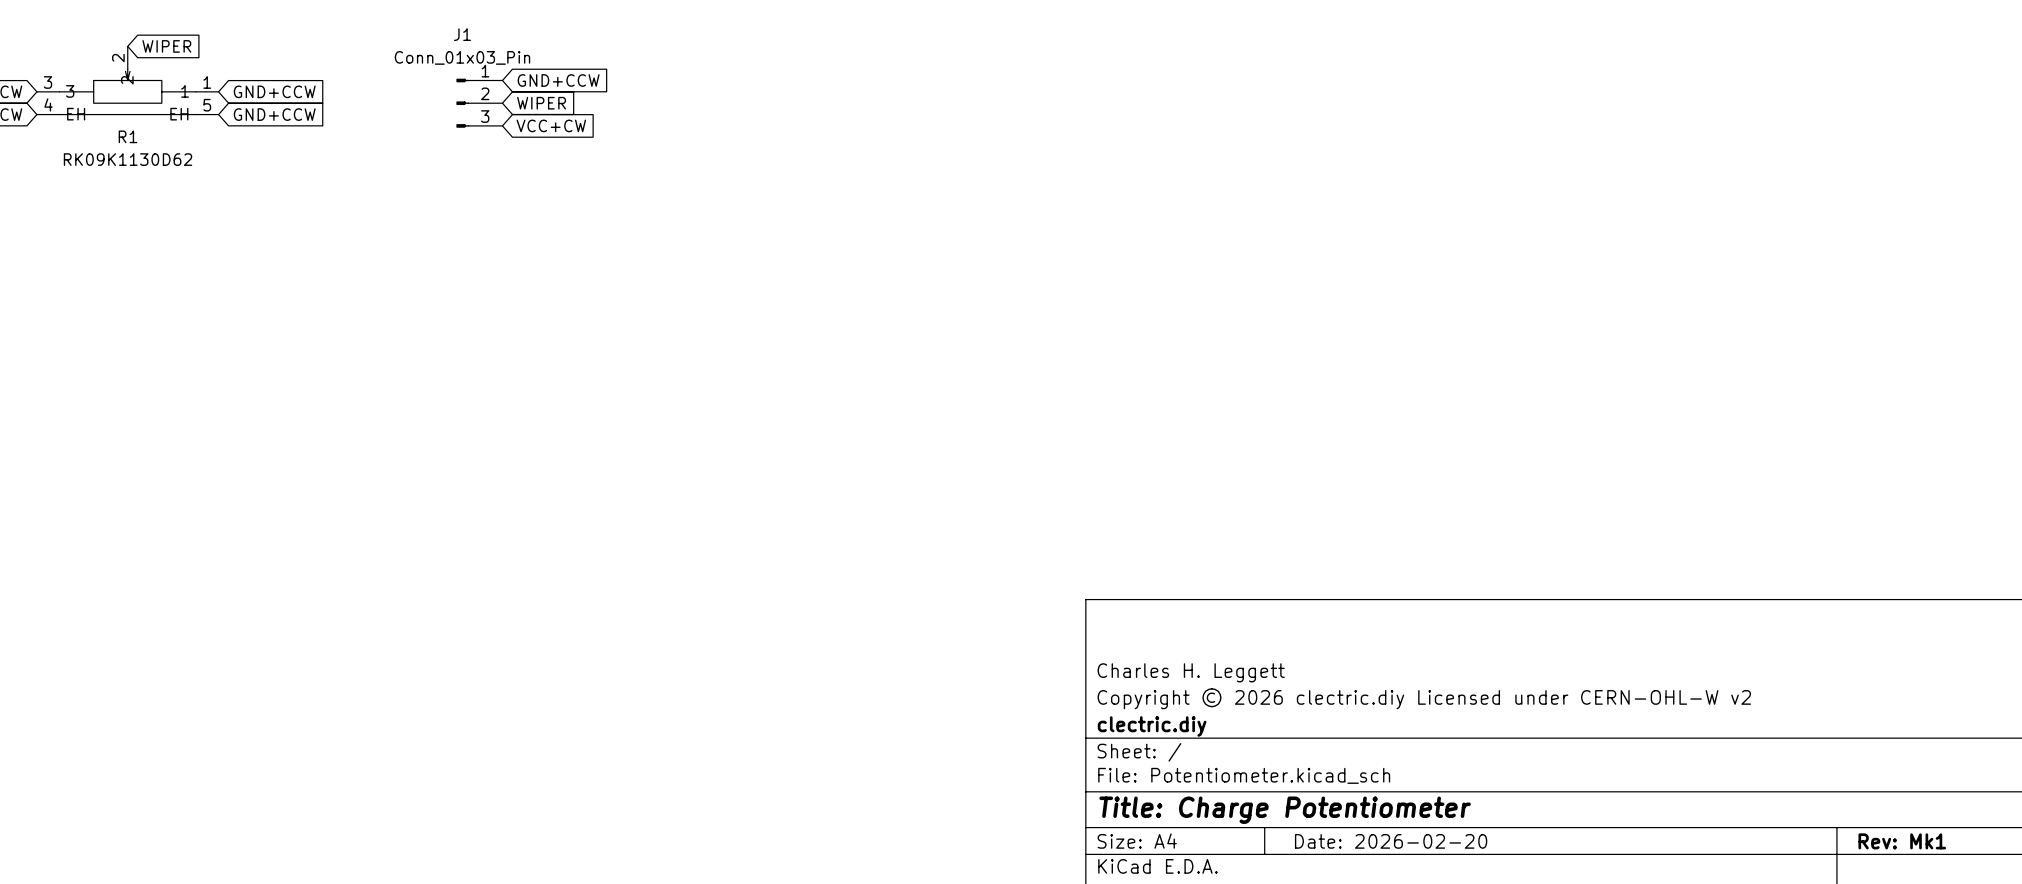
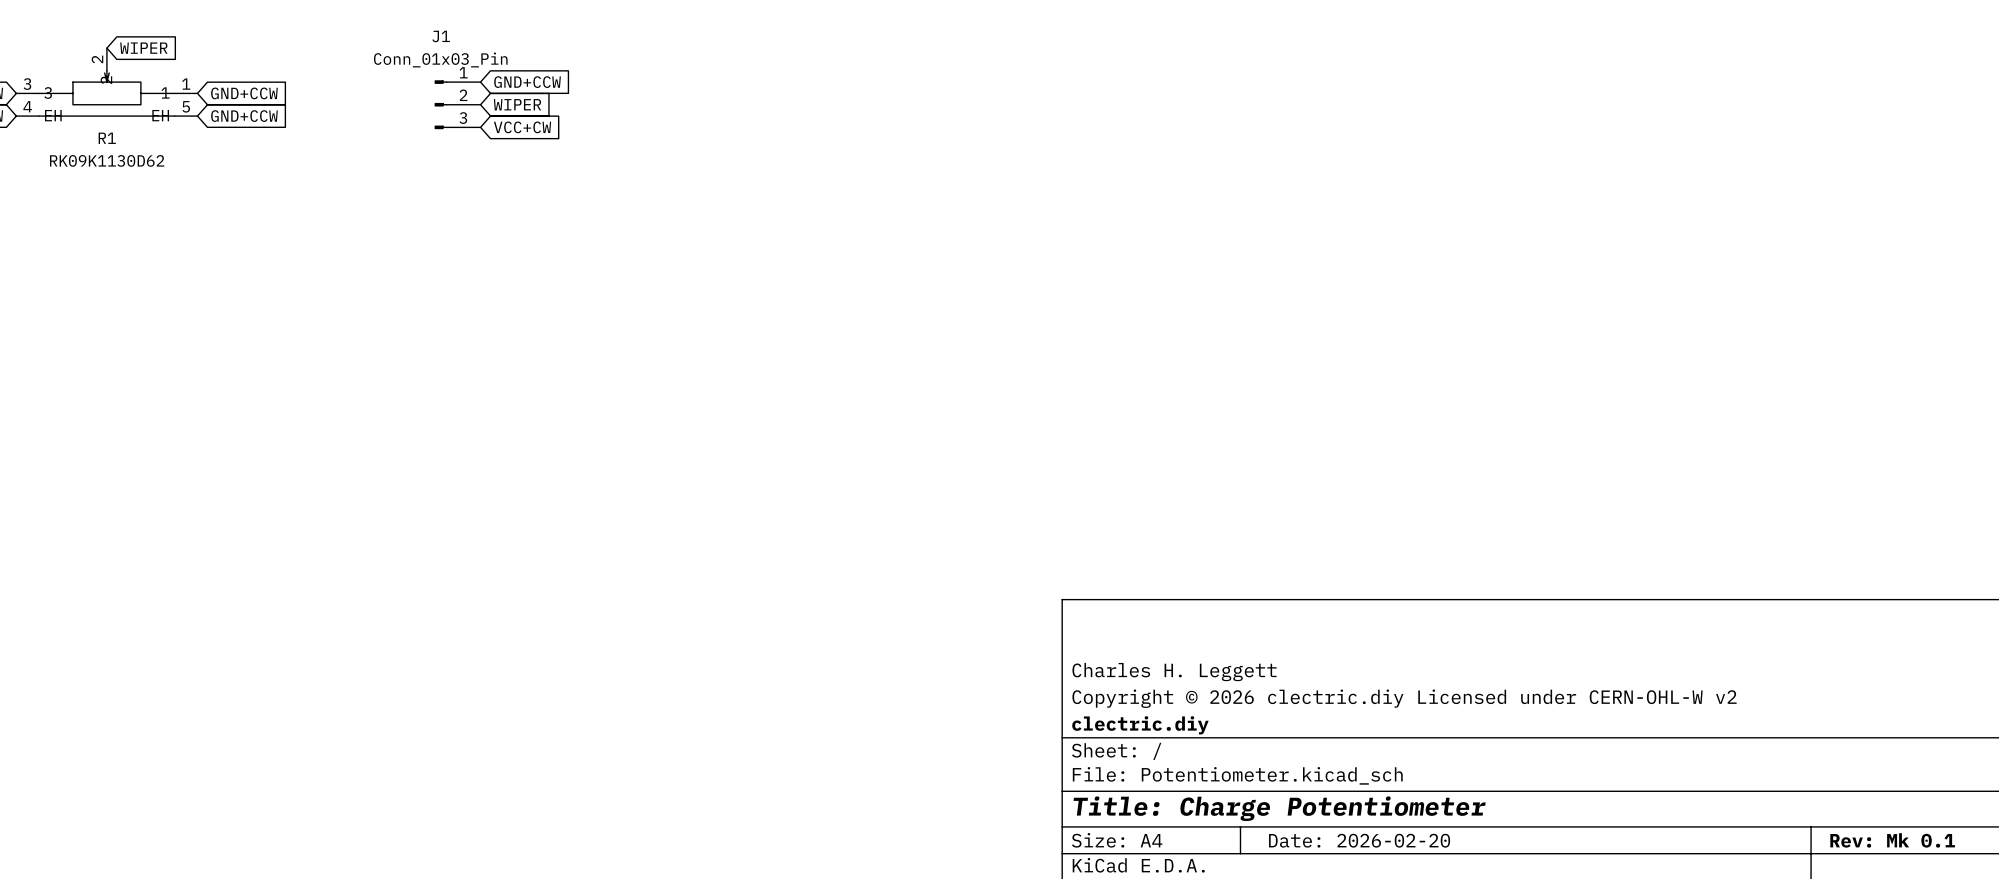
title block: Rev: Mk1 (1902, 841) -> Rev: Mk 0.1 (1892, 840)

